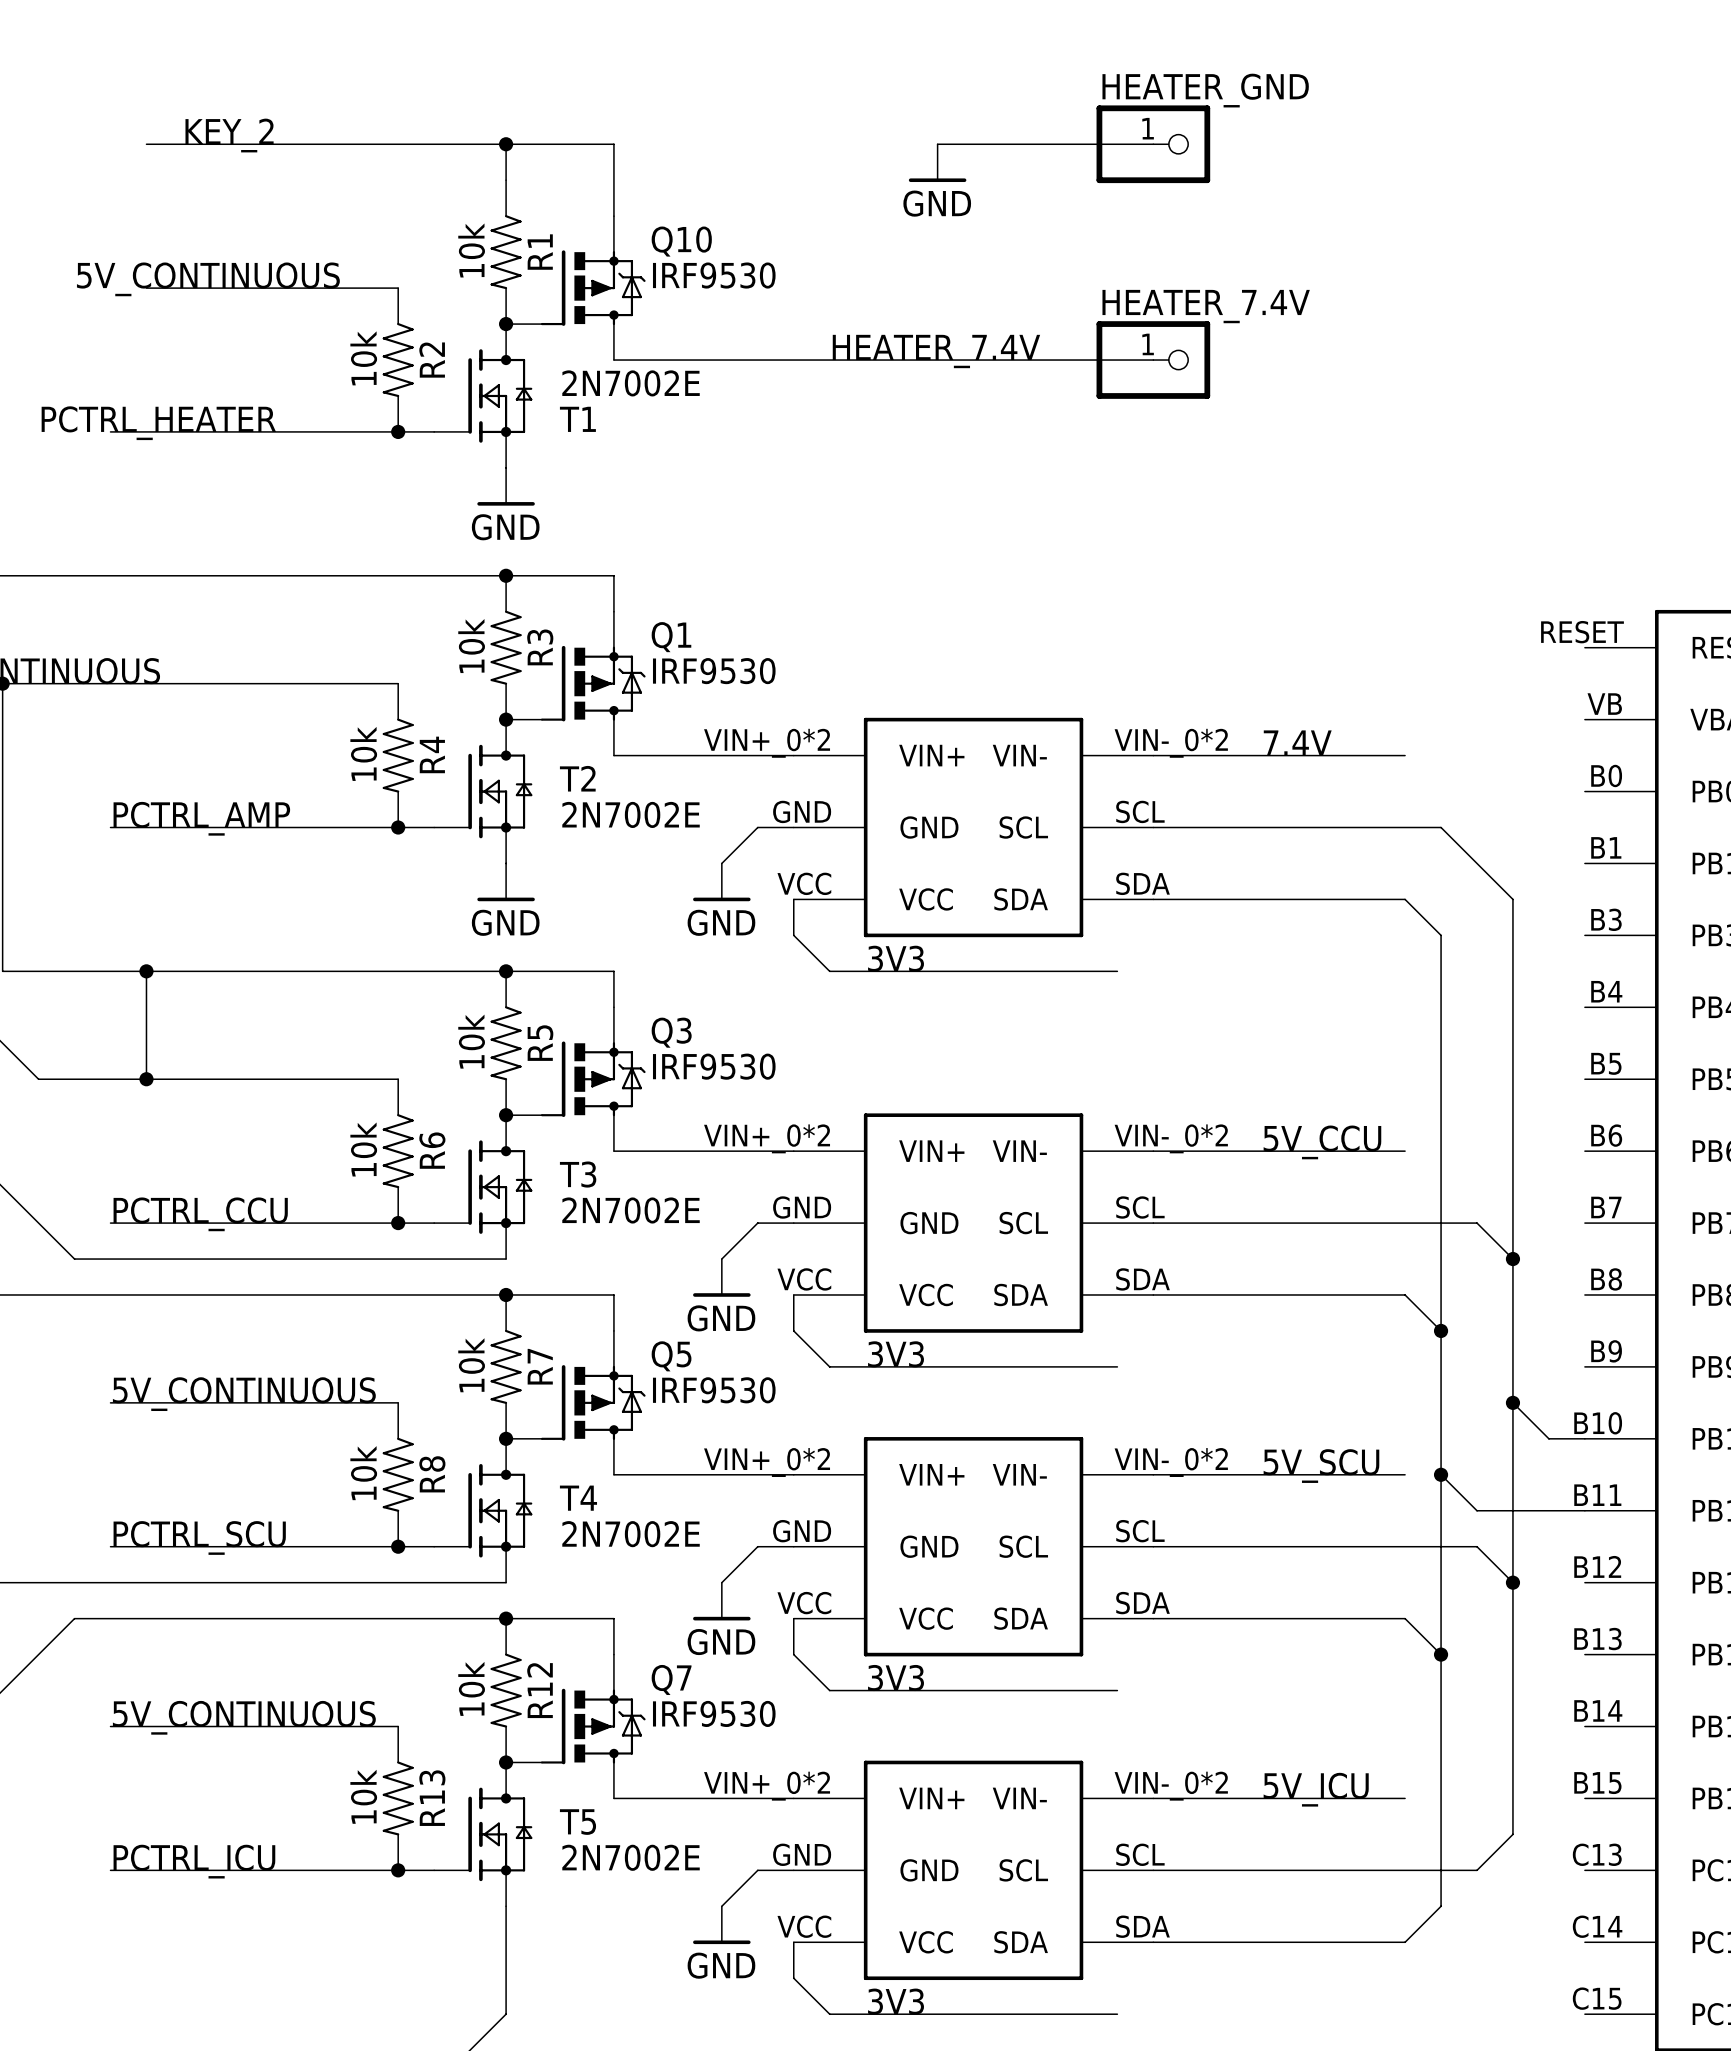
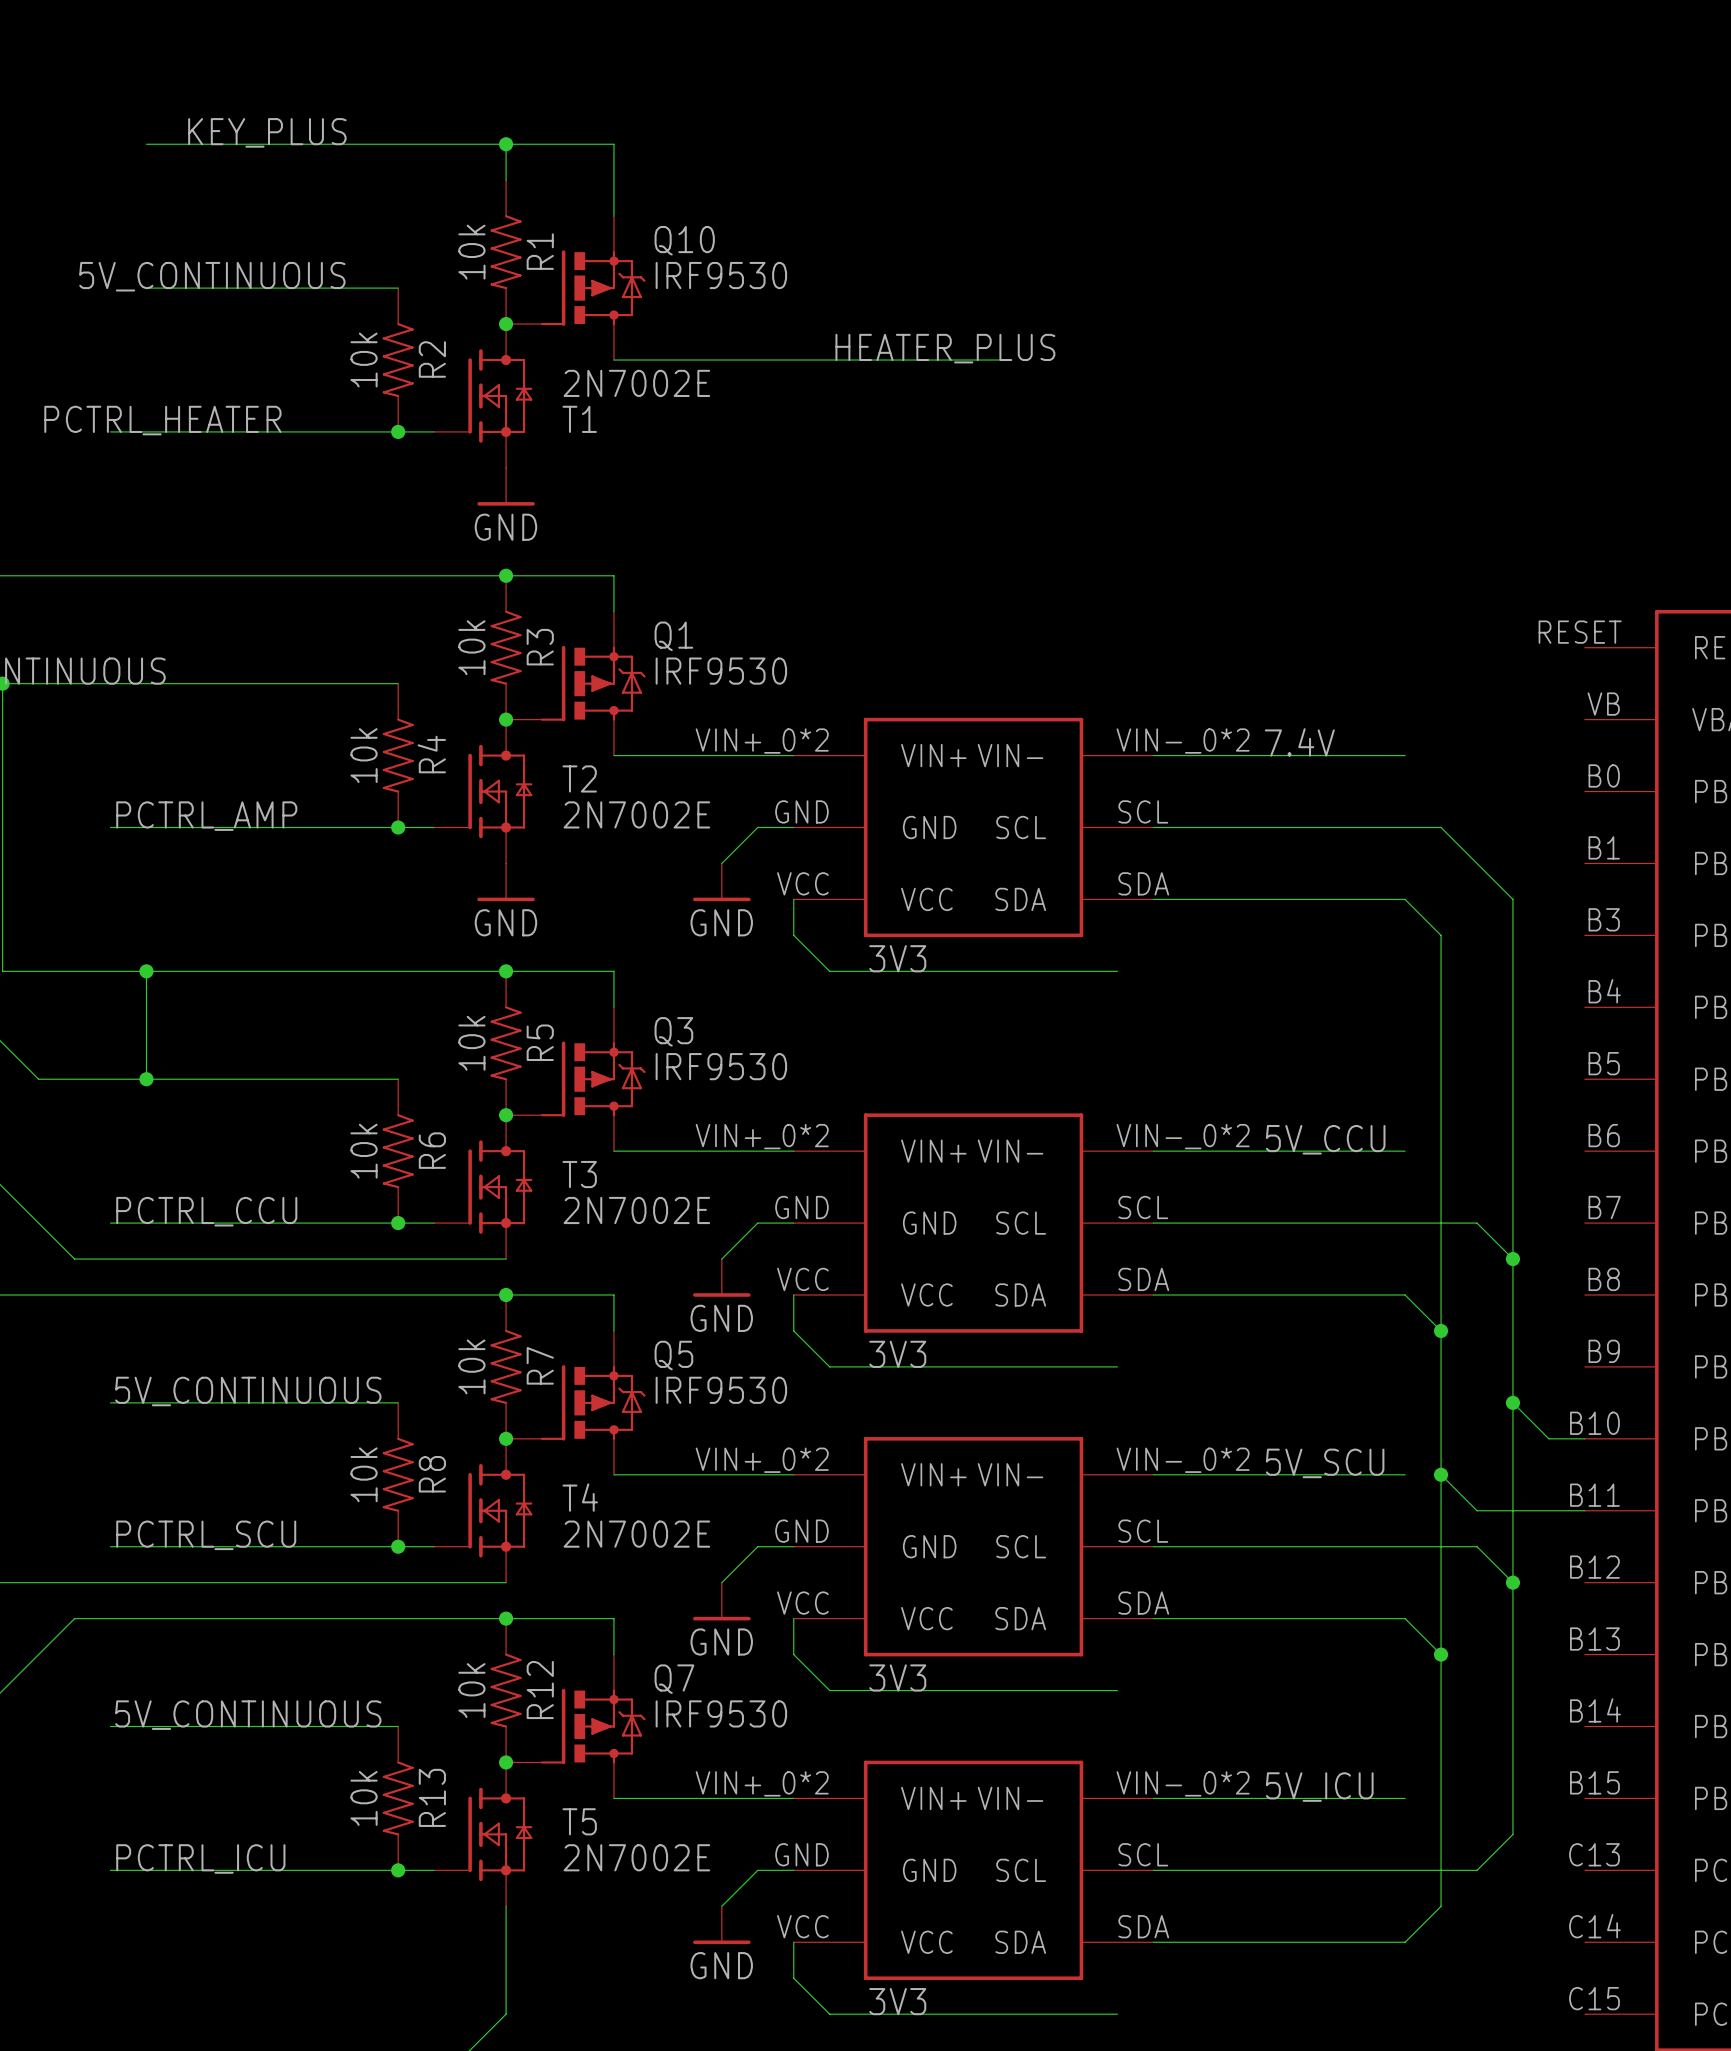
label: KEY_2 (229, 135) -> KEY_PLUS (267, 132)
wire: (937, 144) (1153, 144) -> none
HEATER_GND: (1153, 144) -> none
power symbol: GND (937, 163) -> none
label: HEATER_7.4V (936, 351) -> HEATER_PLUS (945, 348)
wire: (1009, 360) (1153, 360) -> none
HEATER_7.4V: (1153, 360) -> none

